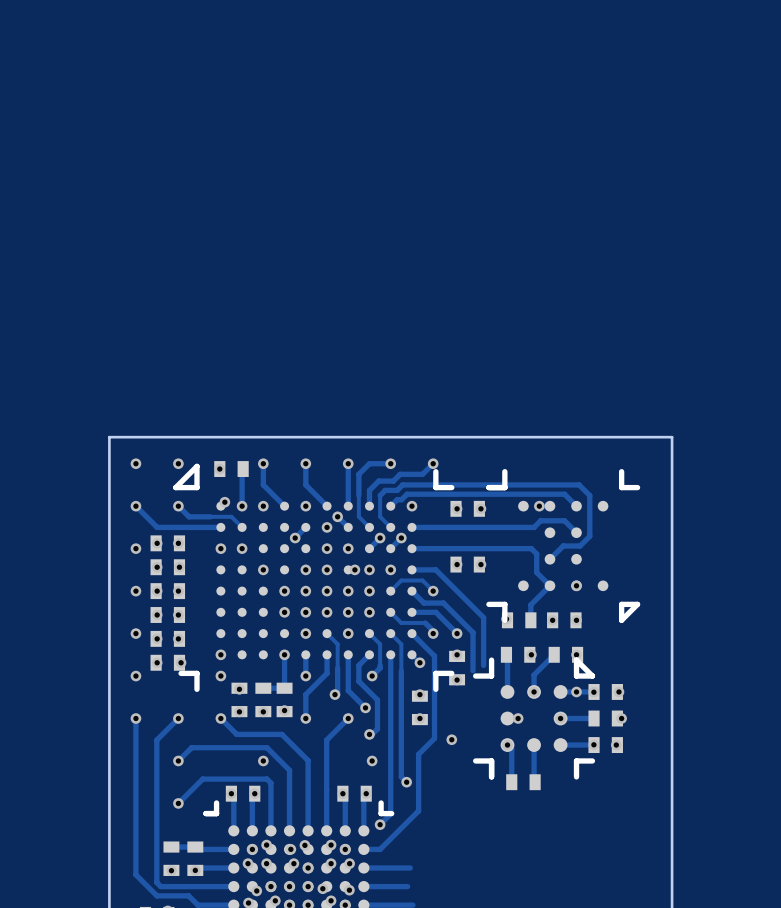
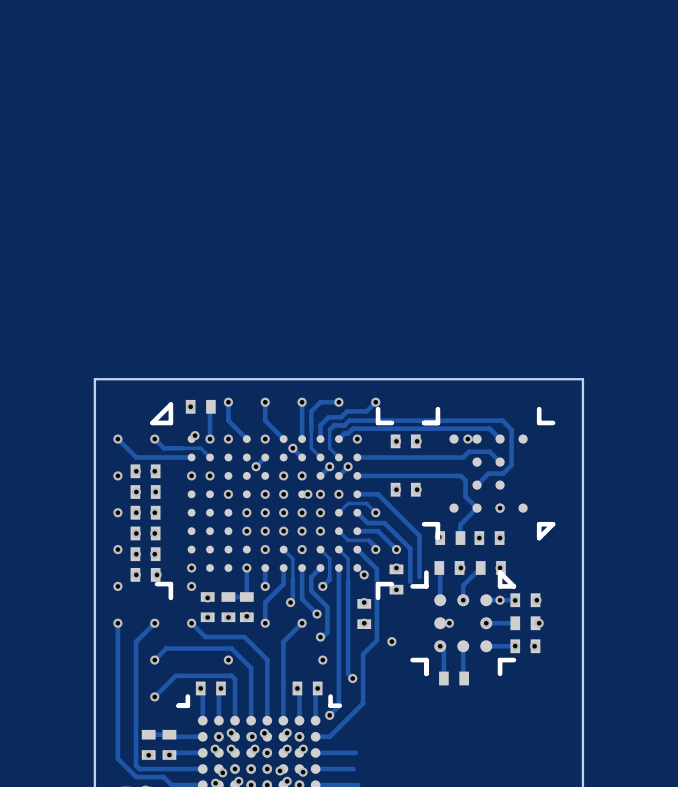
via: (135, 463) -> none
via: (178, 463) -> none
via: (327, 527) -> none

